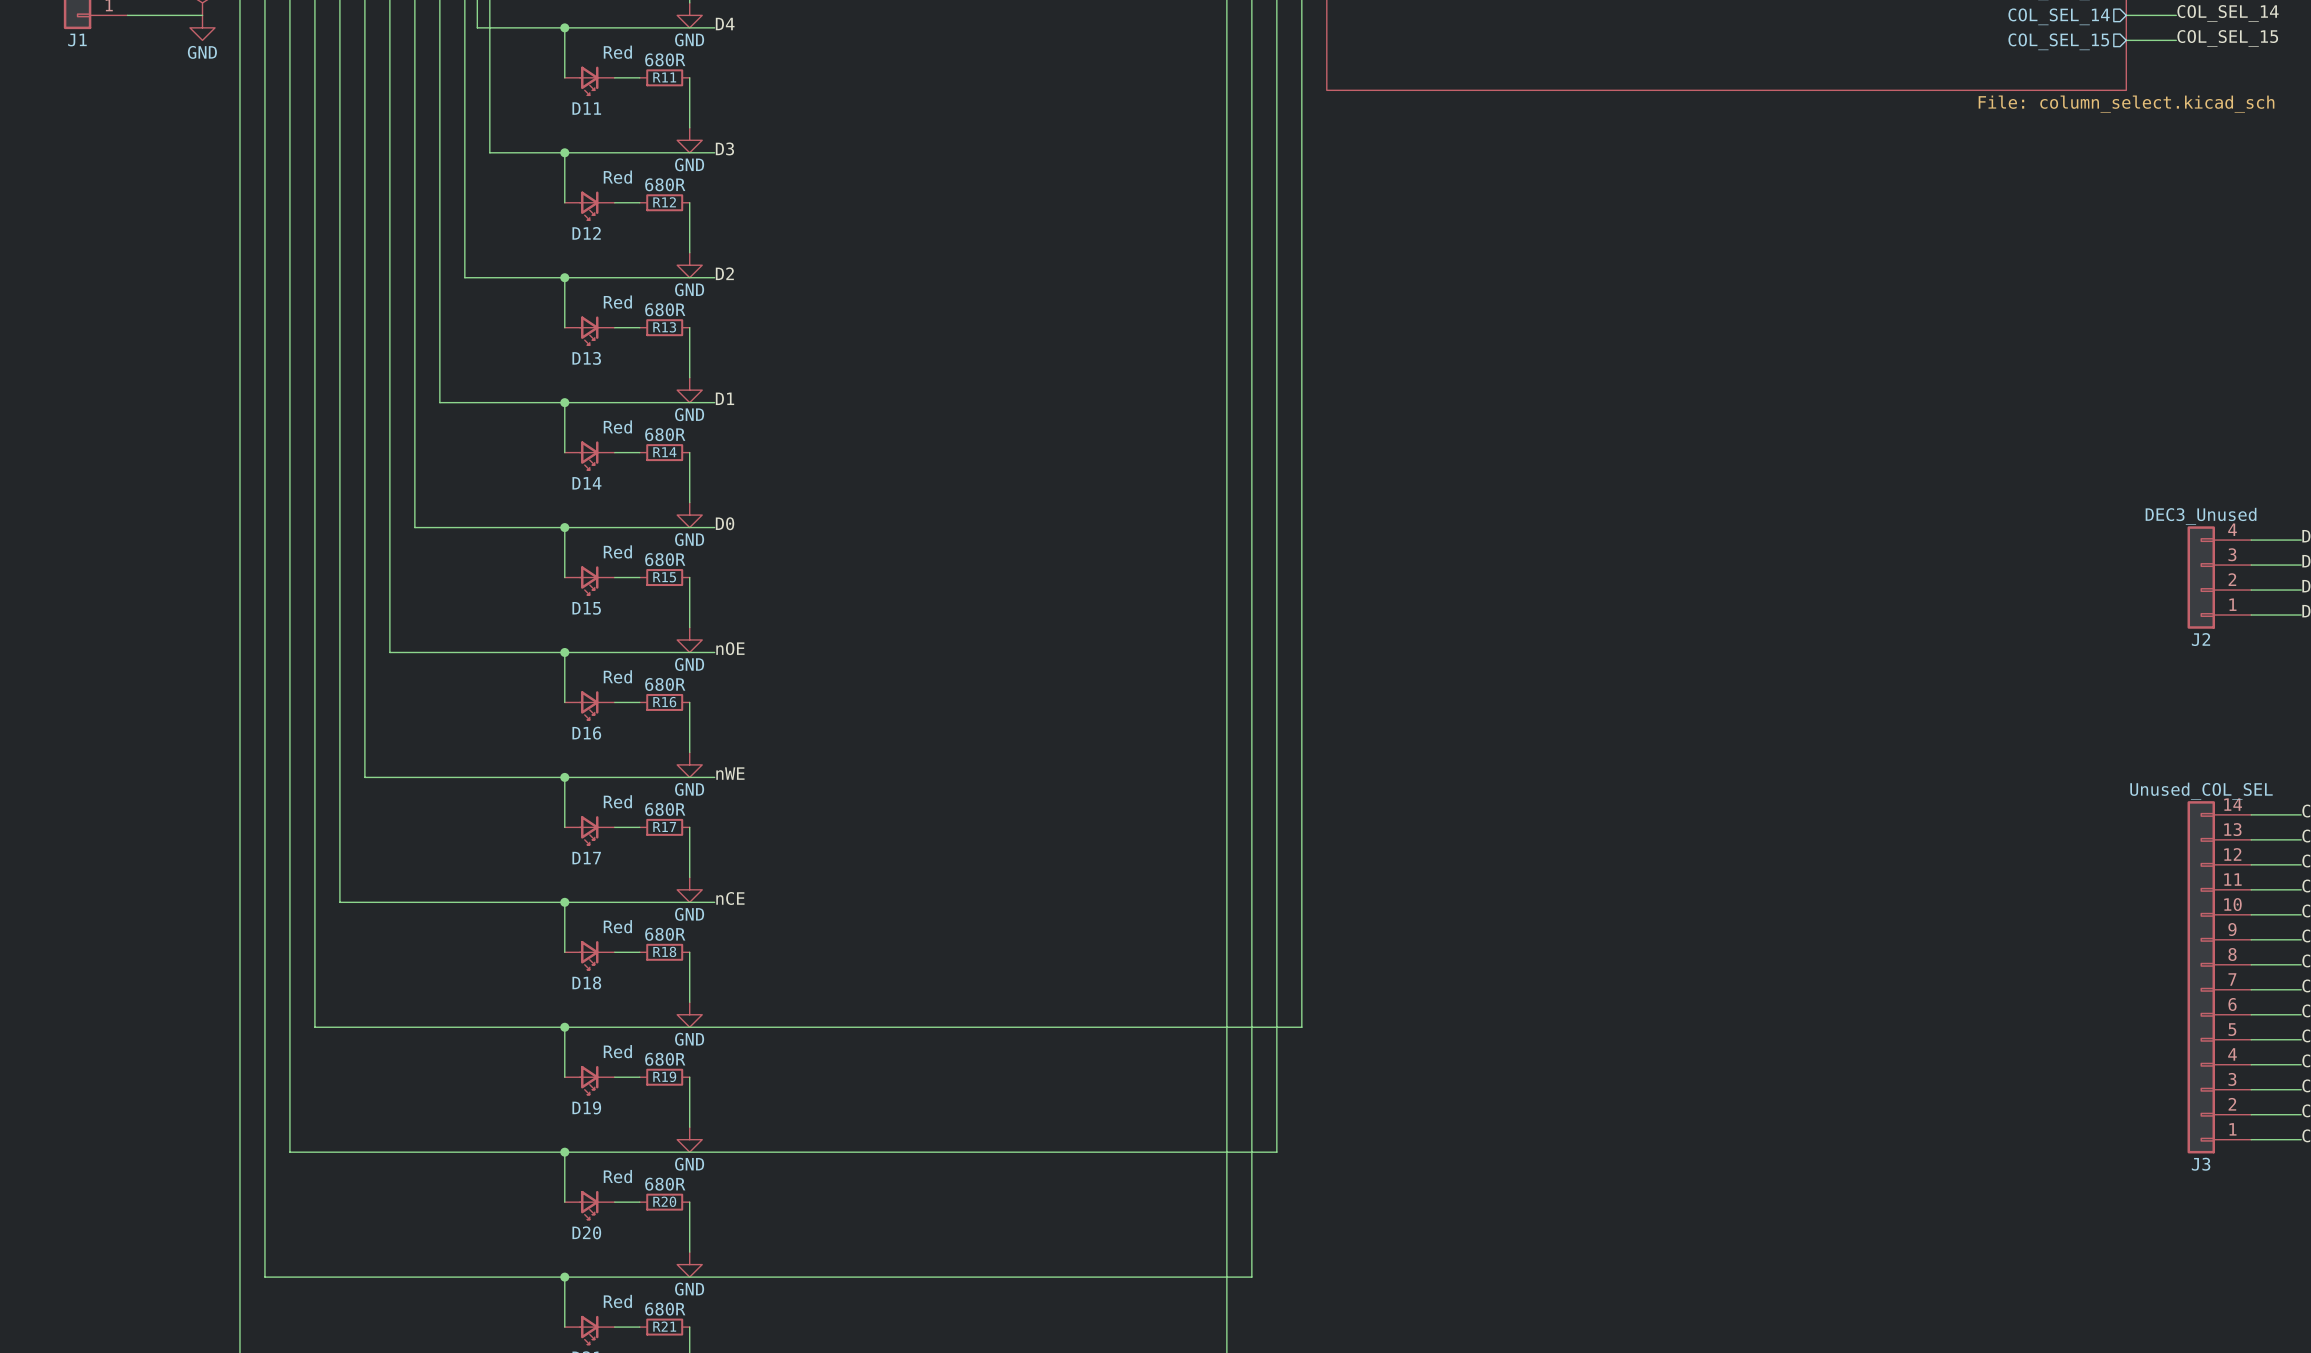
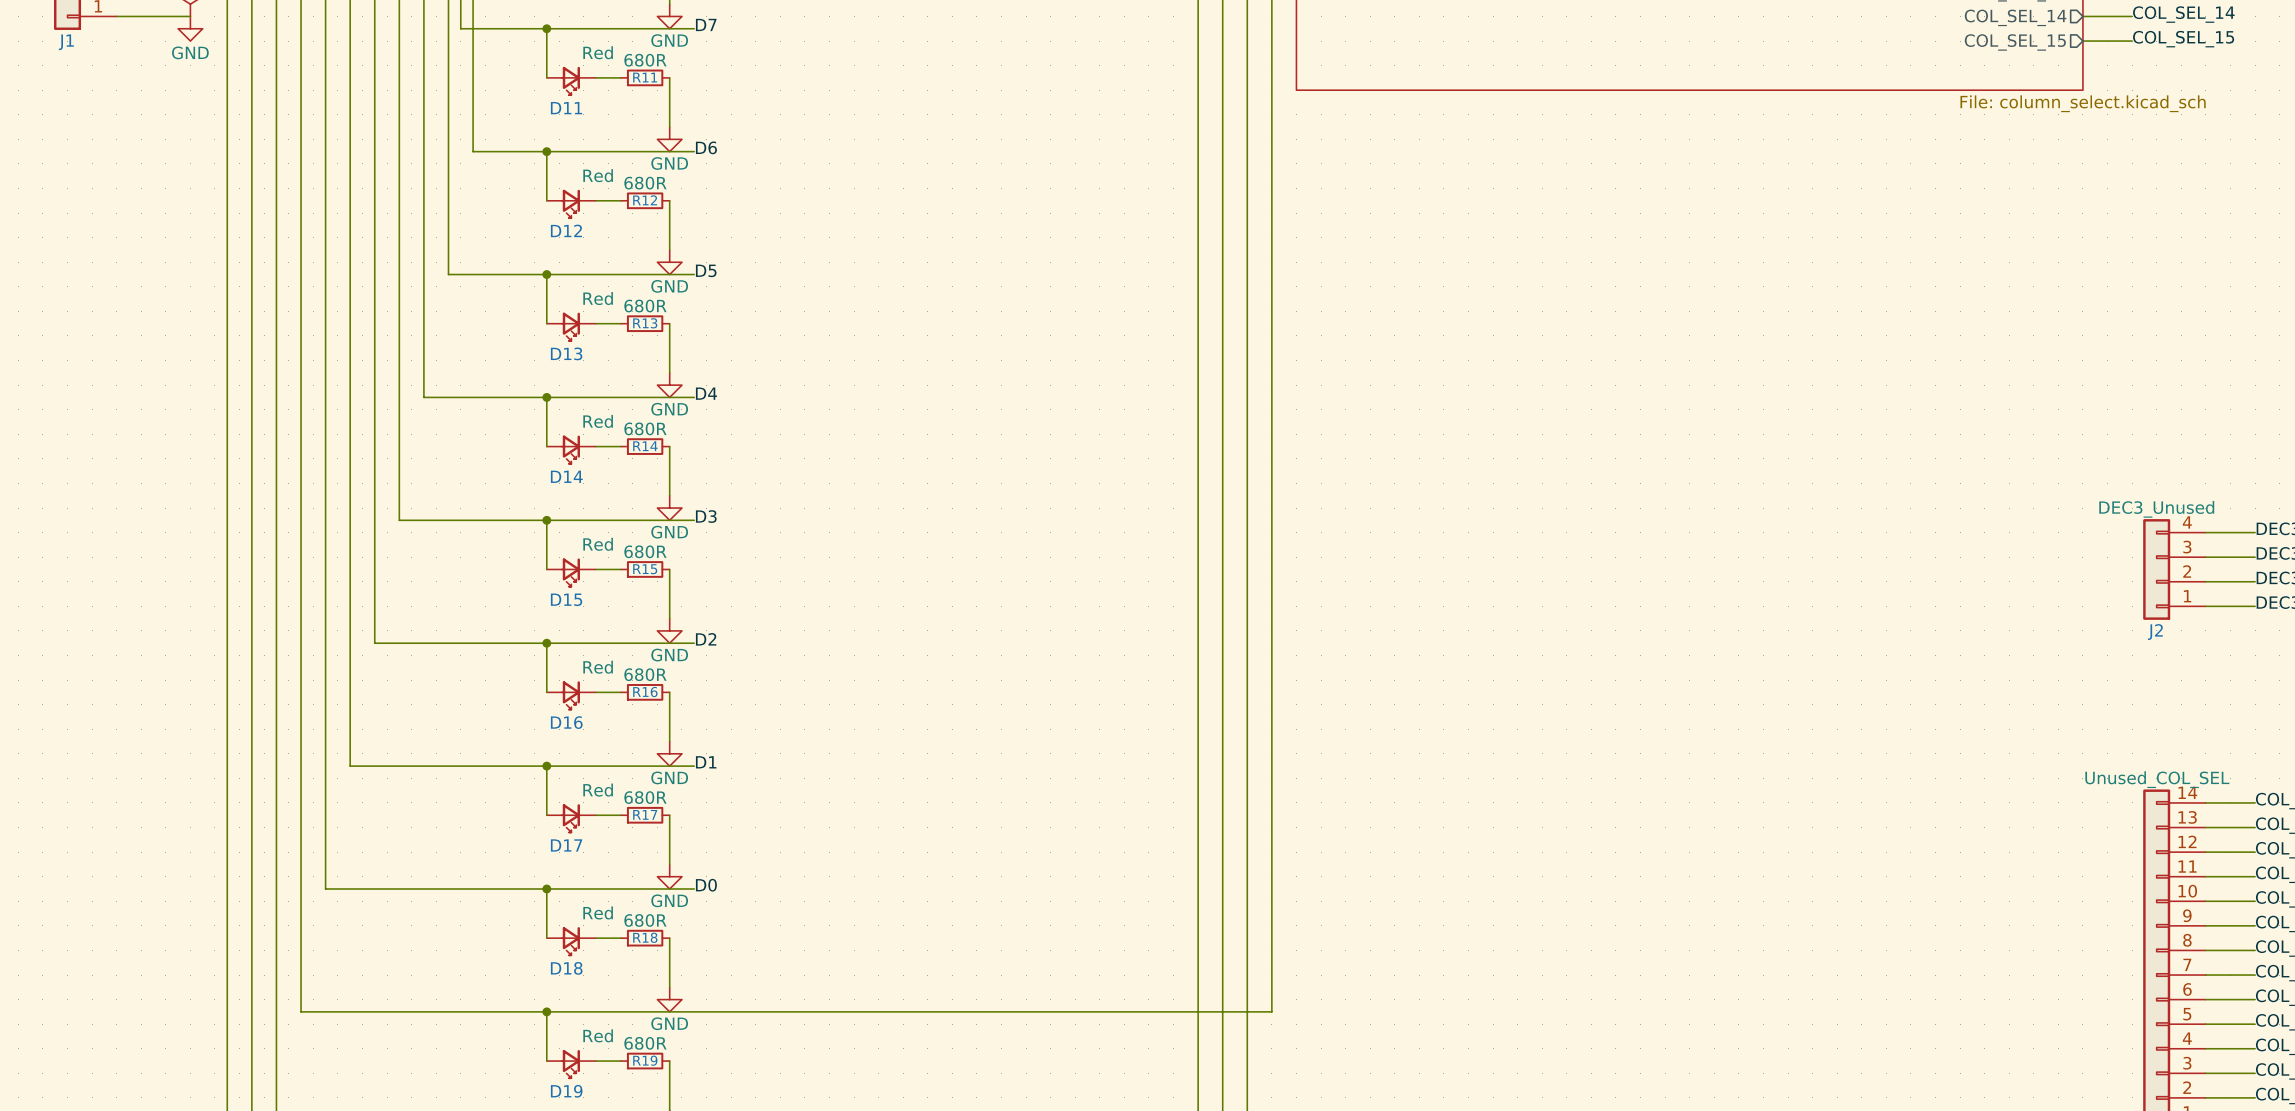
label: D4 (725, 24) -> D7 (706, 24)
label: D3 (724, 148) -> D6 (706, 147)
label: D2 (724, 273) -> D5 (706, 270)
label: D1 (724, 398) -> D4 (706, 393)
label: D0 (725, 523) -> D3 (706, 516)
label: nOE (730, 648) -> D2 (706, 639)
label: nWE (730, 773) -> D1 (706, 762)
label: nCE (730, 898) -> D0 (706, 885)

